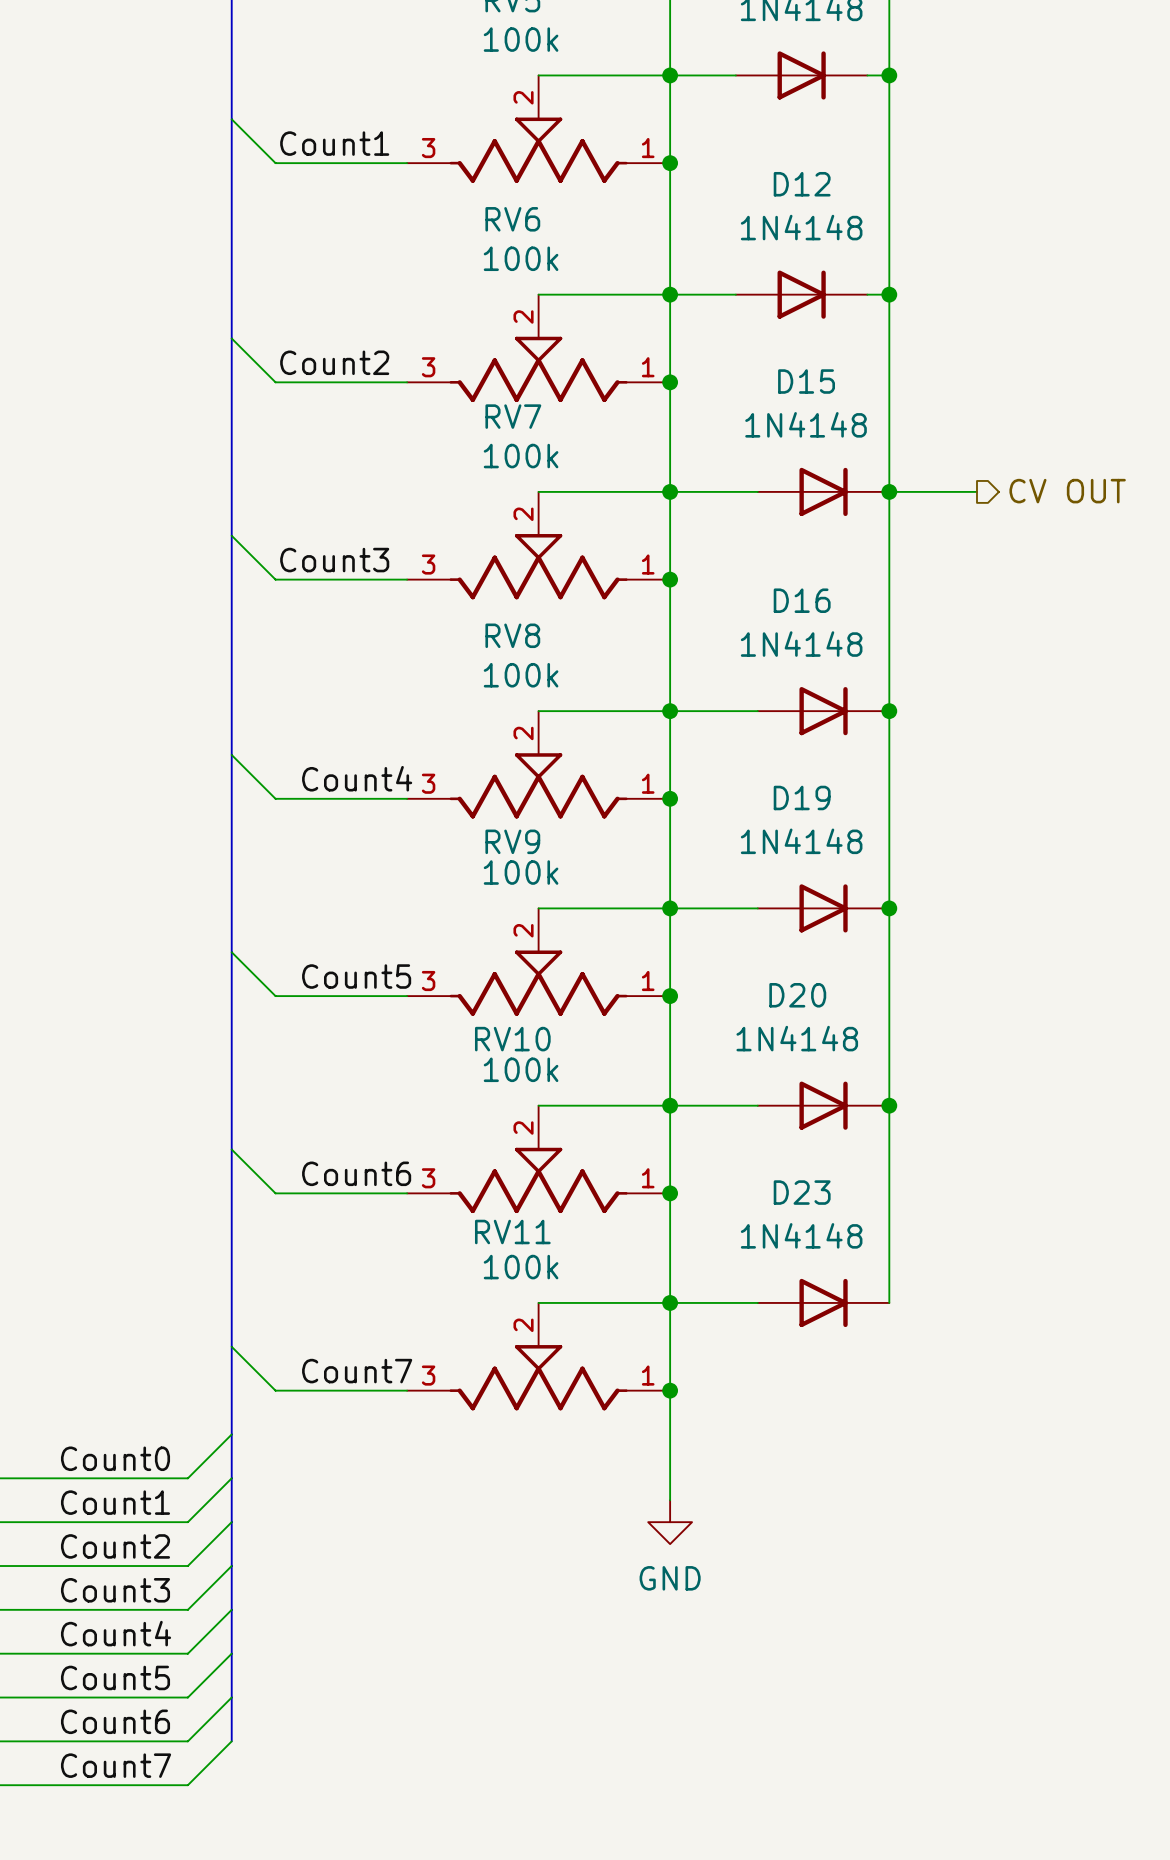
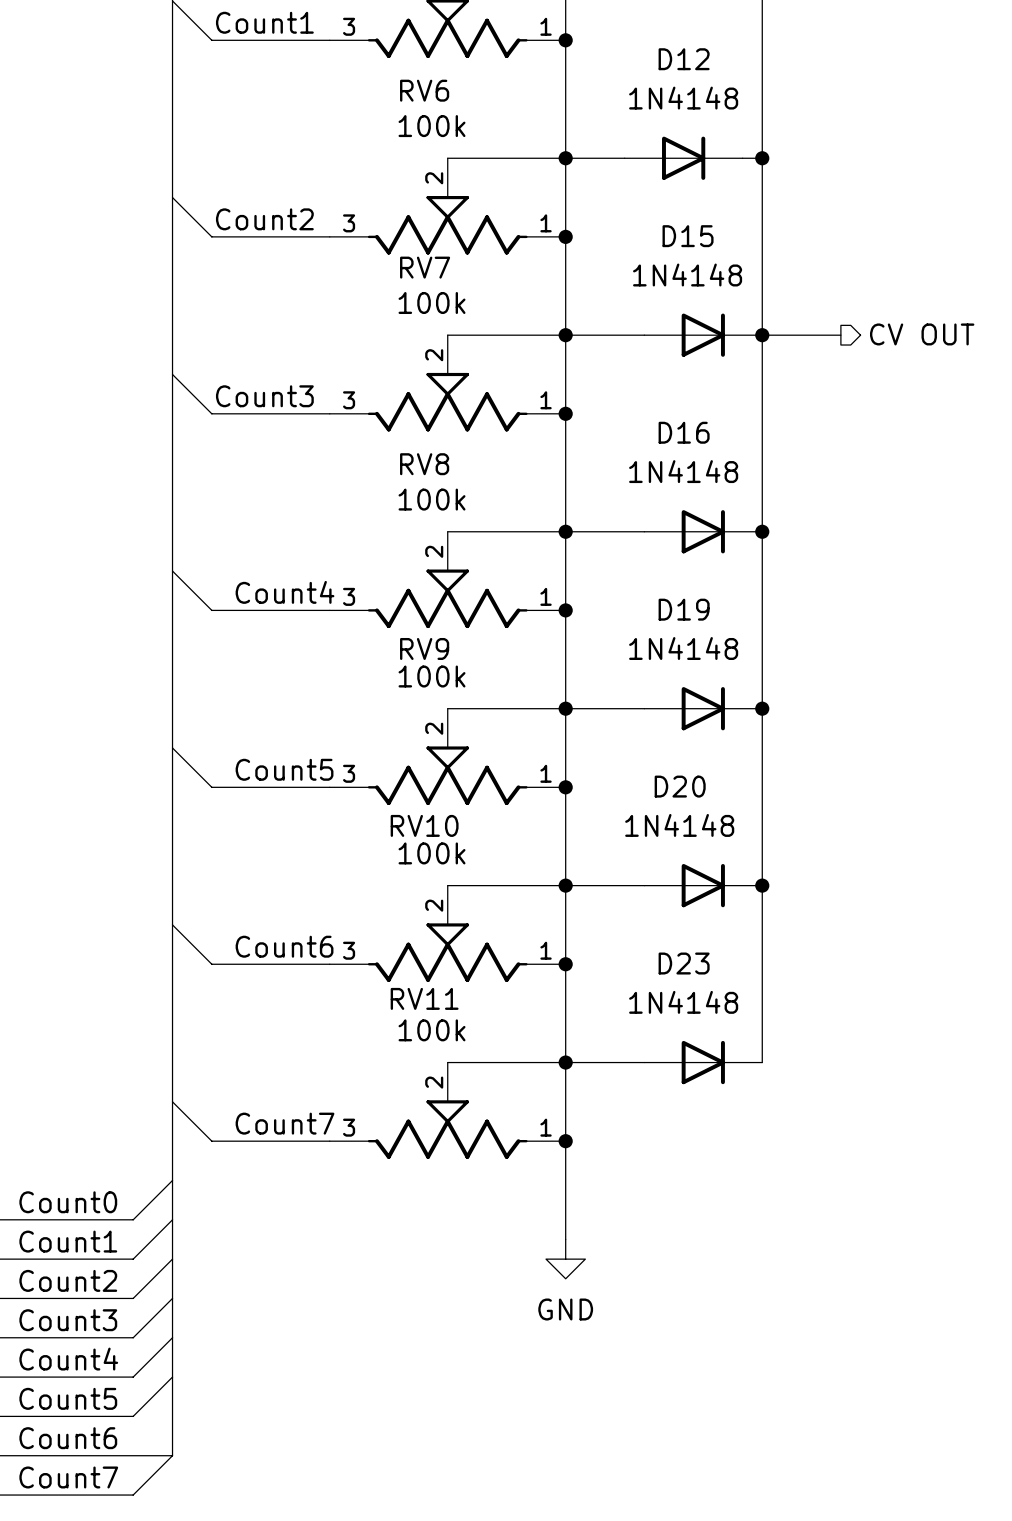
wire: (231, 1697) (187, 1741) -> (172, 1455) (133, 1455)

